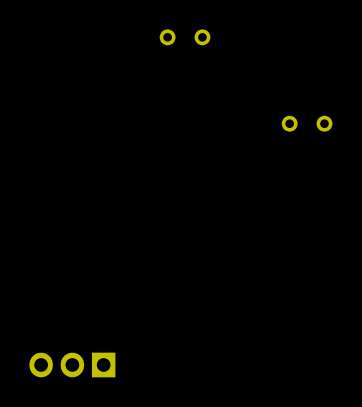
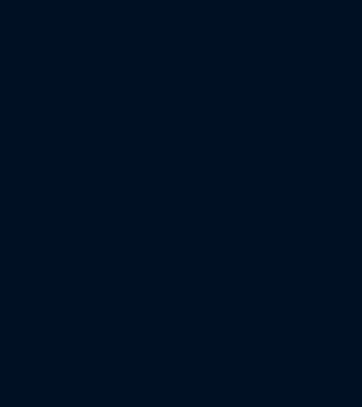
part: (185, 37) -> none
part: (307, 123) -> none
part: (72, 364) -> none

